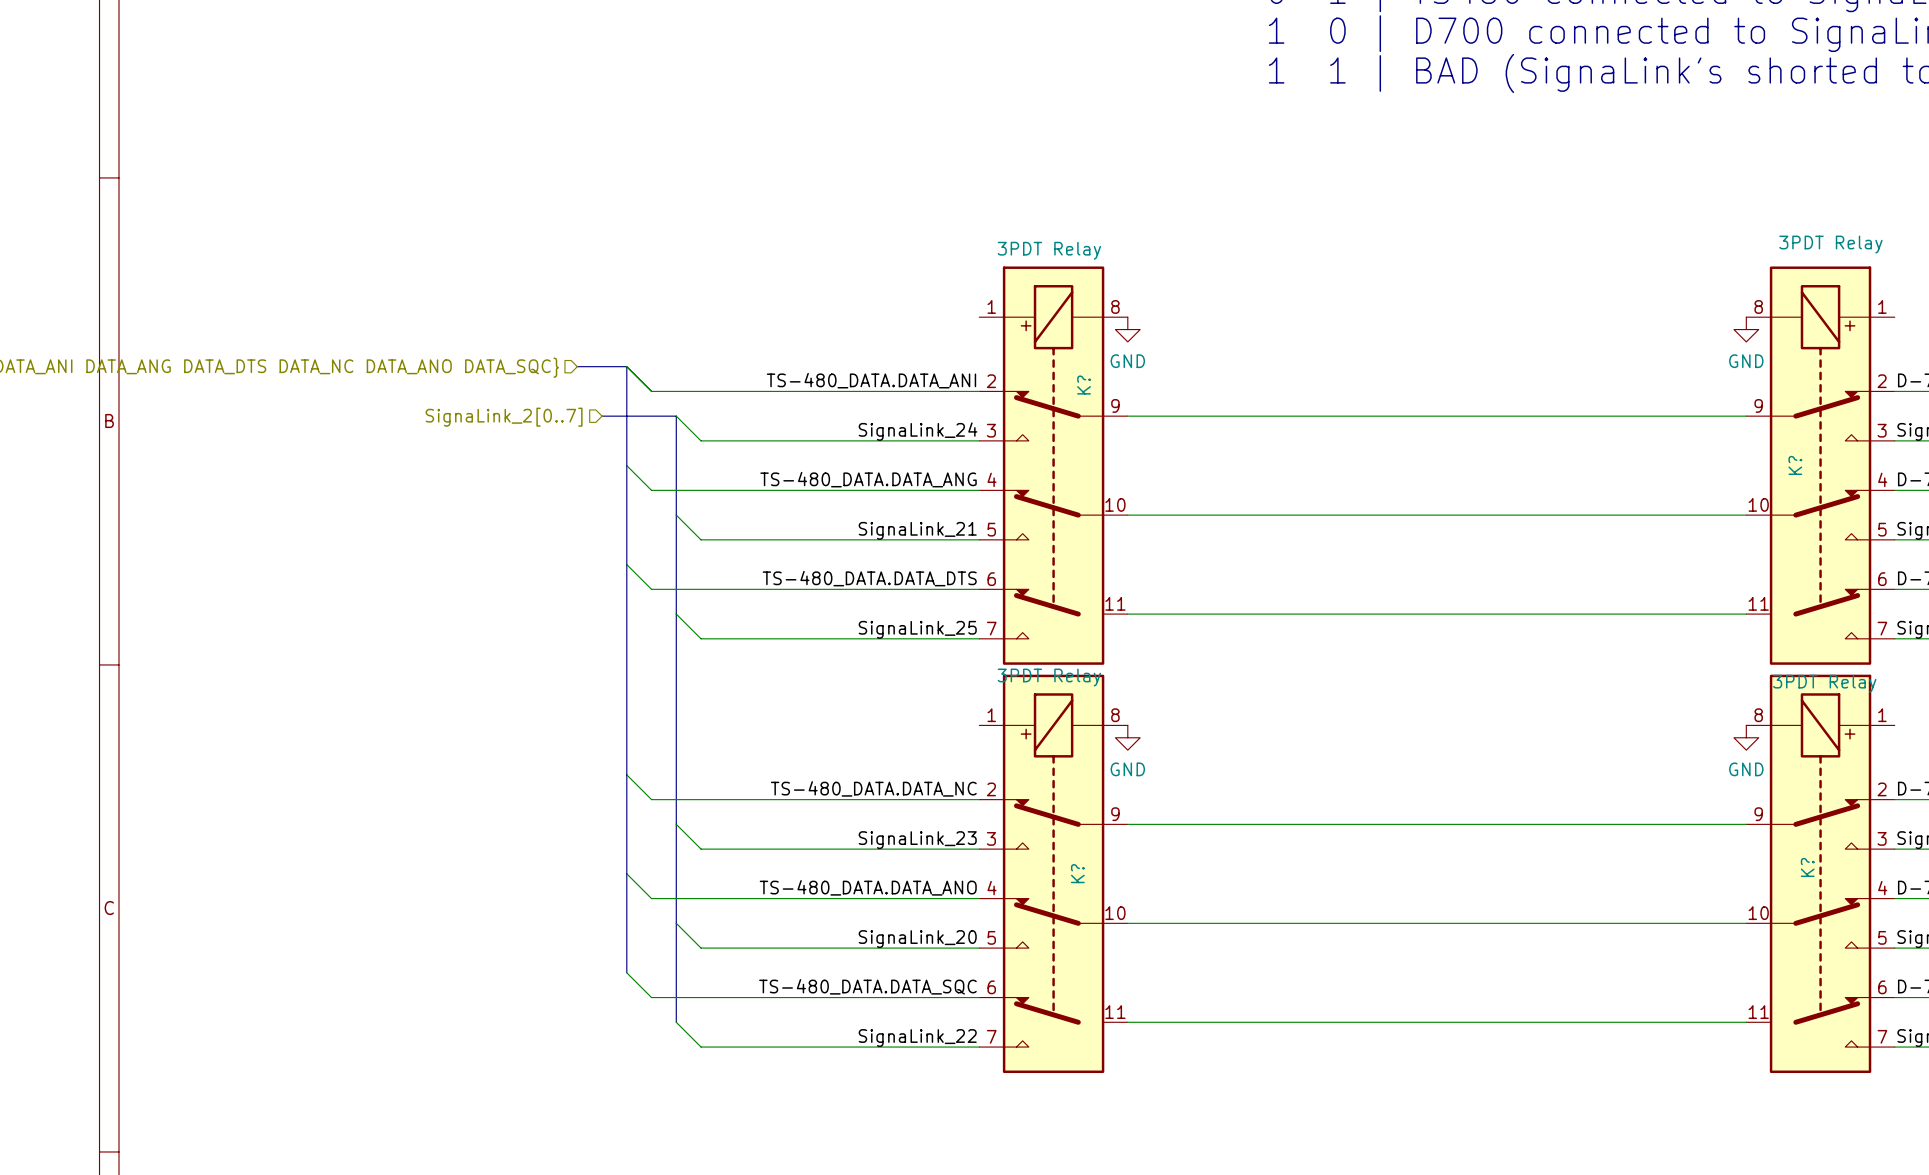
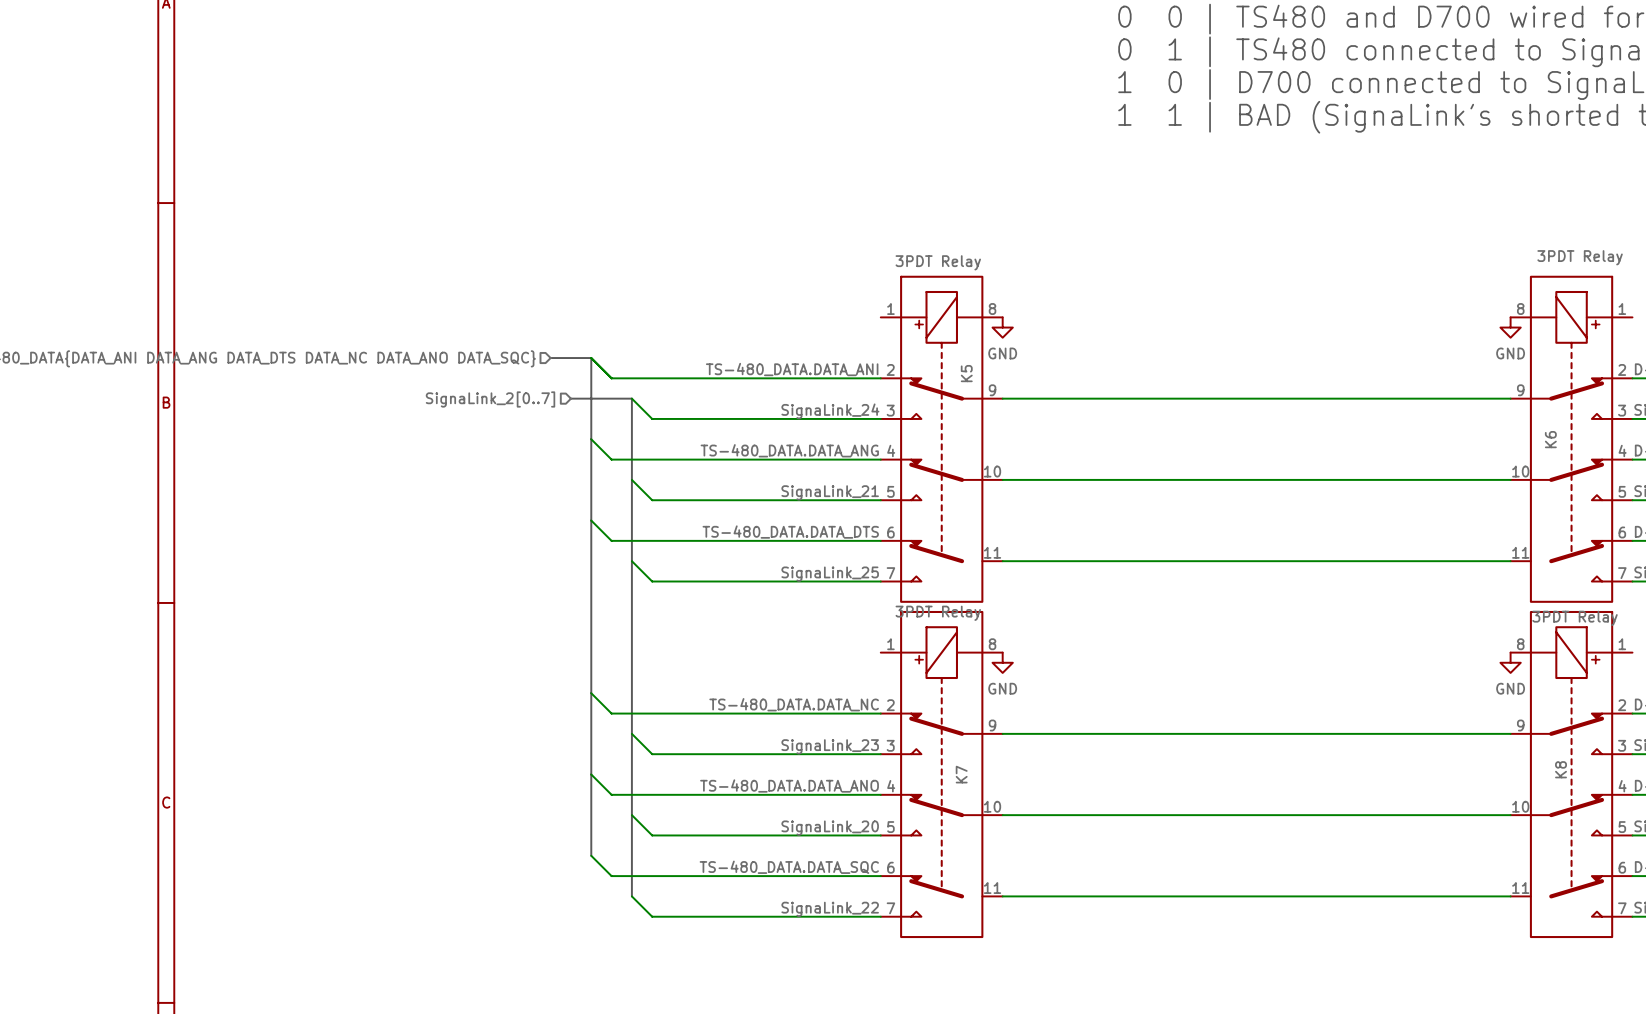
K? name: K? (1084, 385) -> K5 (966, 373)
K? name: K? (1795, 465) -> K6 (1550, 439)
K? name: K? (1807, 867) -> K8 (1561, 769)
K? name: K? (1077, 873) -> K7 (961, 774)

